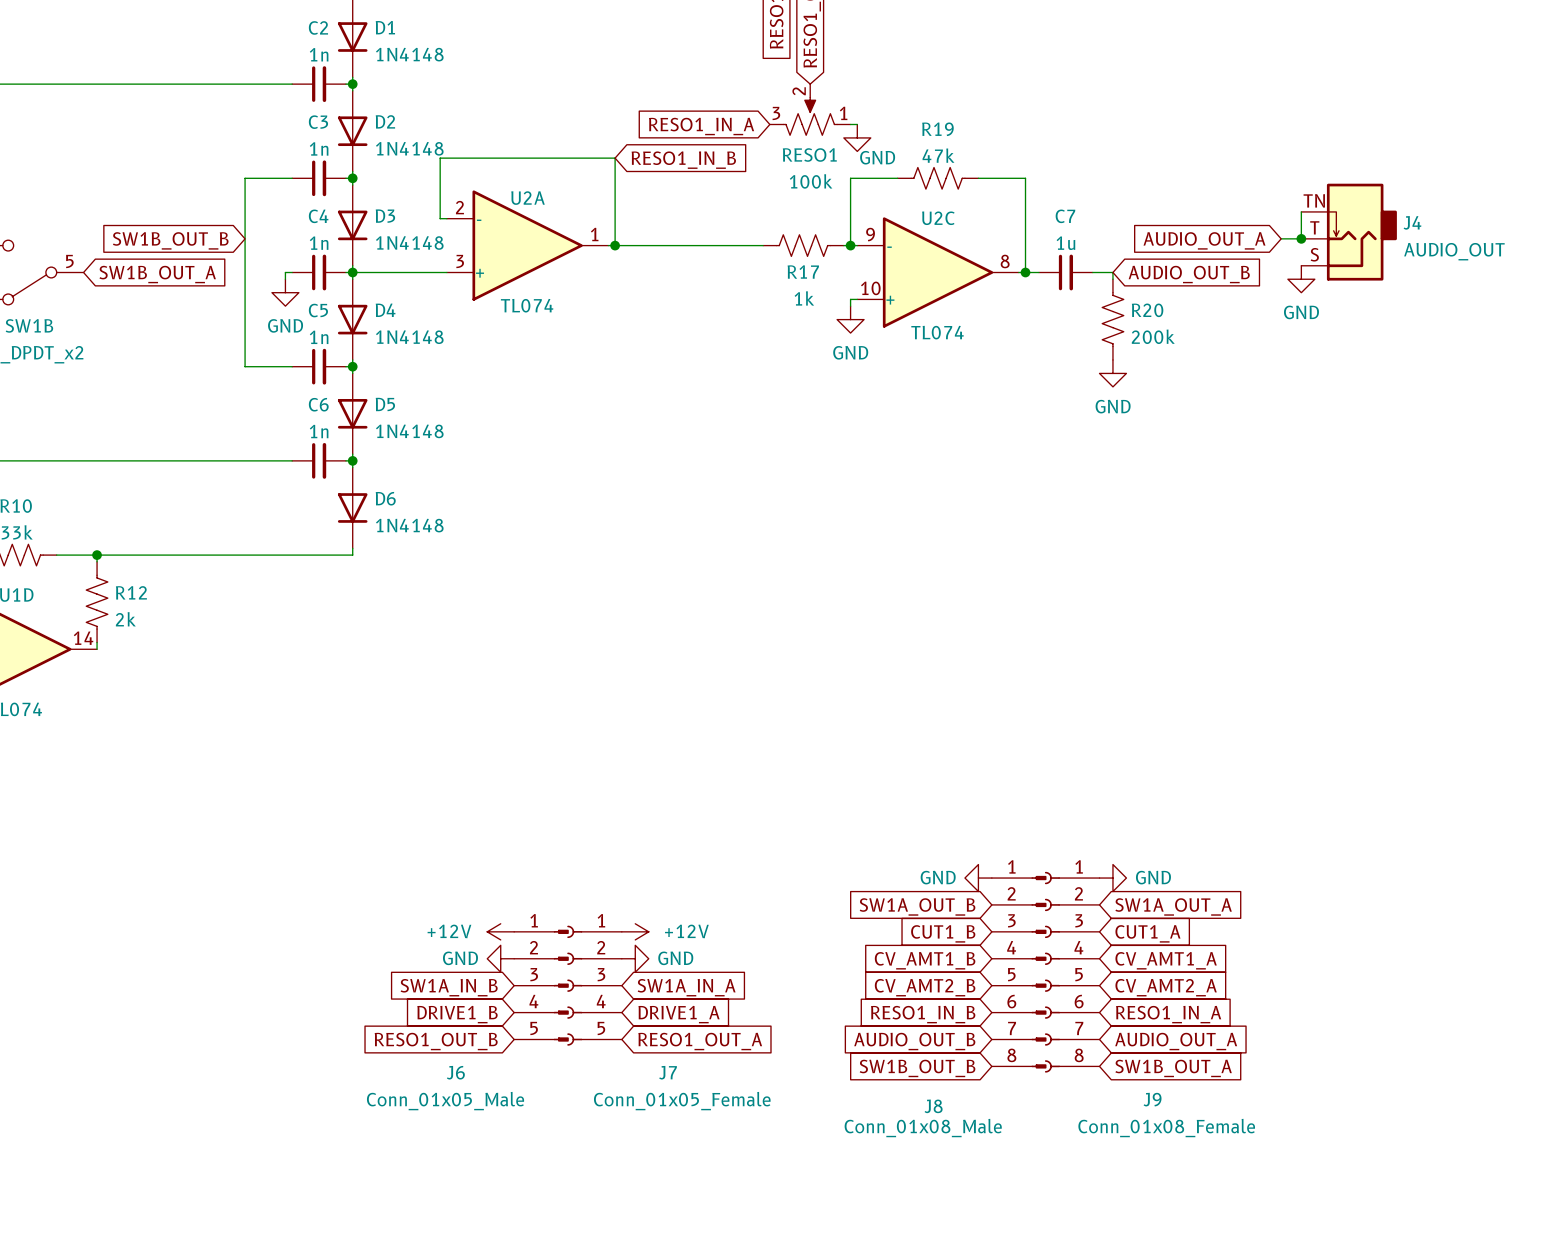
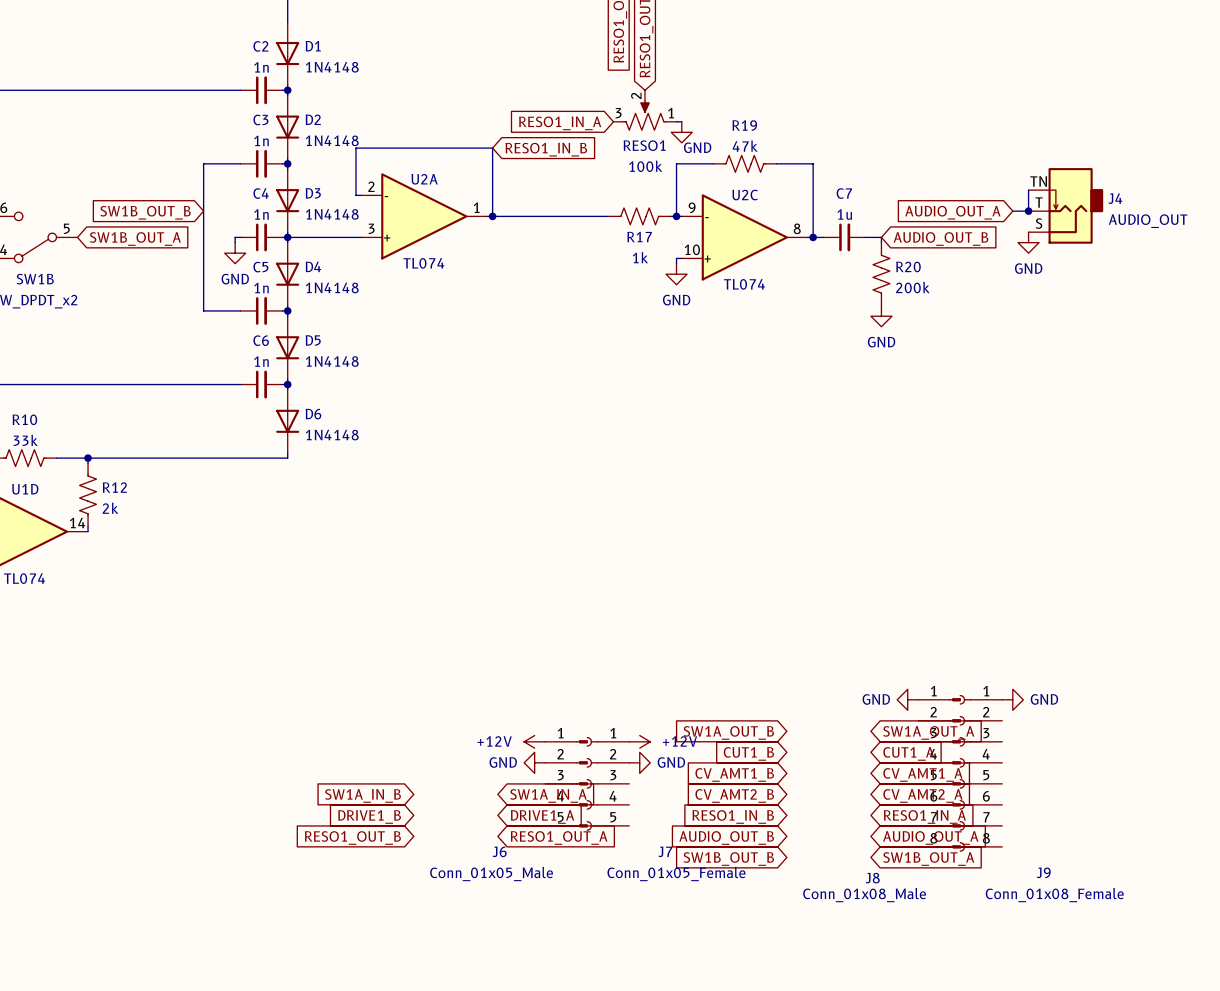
power symbol: none -> GND (1012, 699)
power symbol: GND (978, 878) -> none
power symbol rotation: 0° (1112, 878) -> 180° (907, 699)
power symbol position: GND (1112, 878) -> GND (907, 699)
power symbol: none -> +12V (639, 741)
power symbol: +12V (500, 931) -> none
power symbol rotation: 0° (635, 931) -> 180° (534, 741)
power symbol position: +12V (635, 931) -> +12V (534, 741)
power symbol: none -> GND (639, 762)
power symbol: GND (500, 958) -> none
power symbol rotation: 0° (635, 958) -> 180° (534, 762)
power symbol position: GND (635, 958) -> GND (534, 762)
J8 position: (1019, 972) -> (939, 773)
J9 position: (1072, 972) -> (980, 773)
J6 position: (541, 985) -> (566, 783)
J7 position: (594, 985) -> (607, 783)

